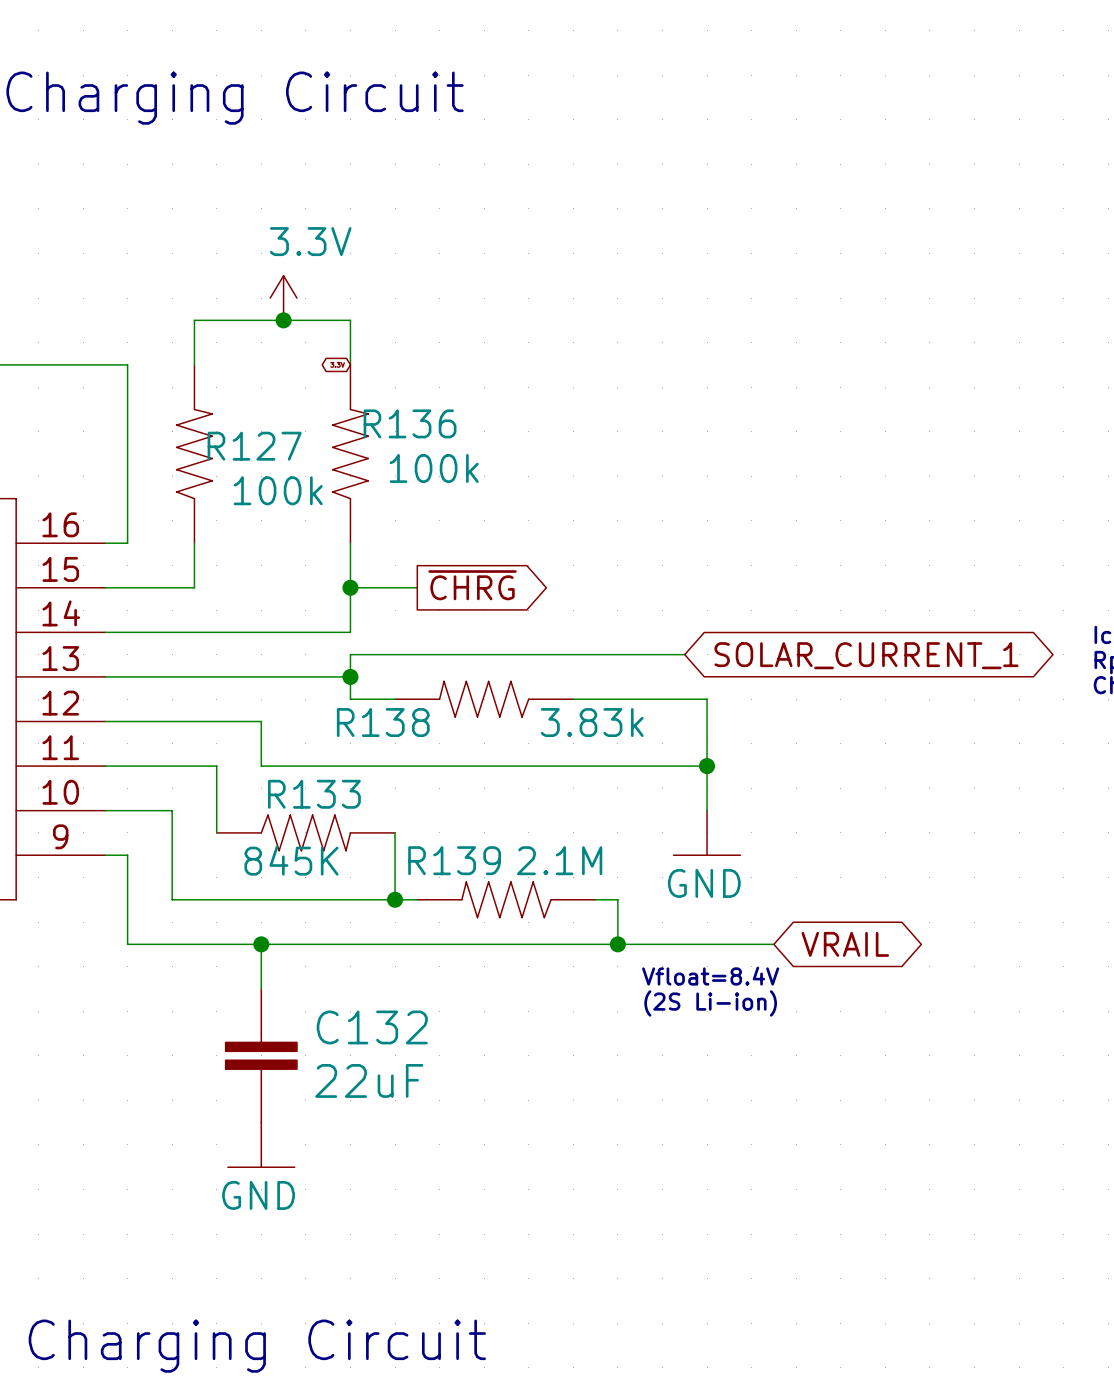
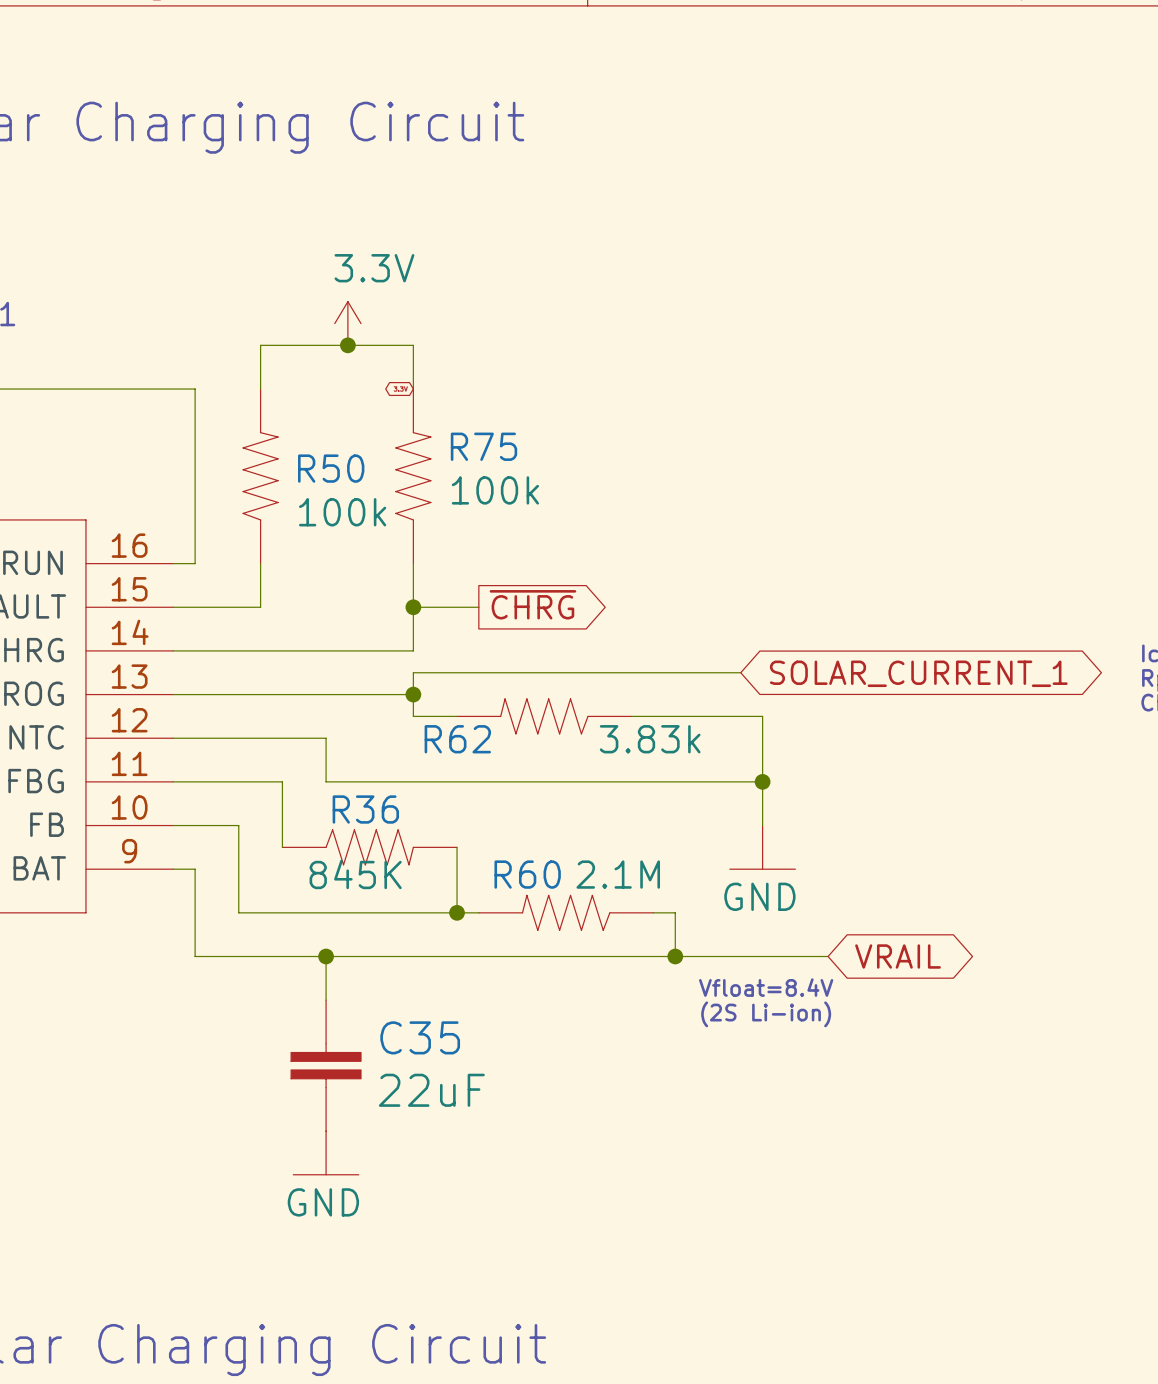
R136 name: R136 (410, 423) -> R75 (483, 446)
R127 name: R127 (254, 446) -> R50 (331, 468)
R138 name: R138 (383, 722) -> R62 (457, 739)
R133 name: R133 (314, 794) -> R36 (365, 809)
R139 name: R139 (454, 860) -> R60 (527, 874)
C132 name: C132 (372, 1027) -> C35 (420, 1037)

